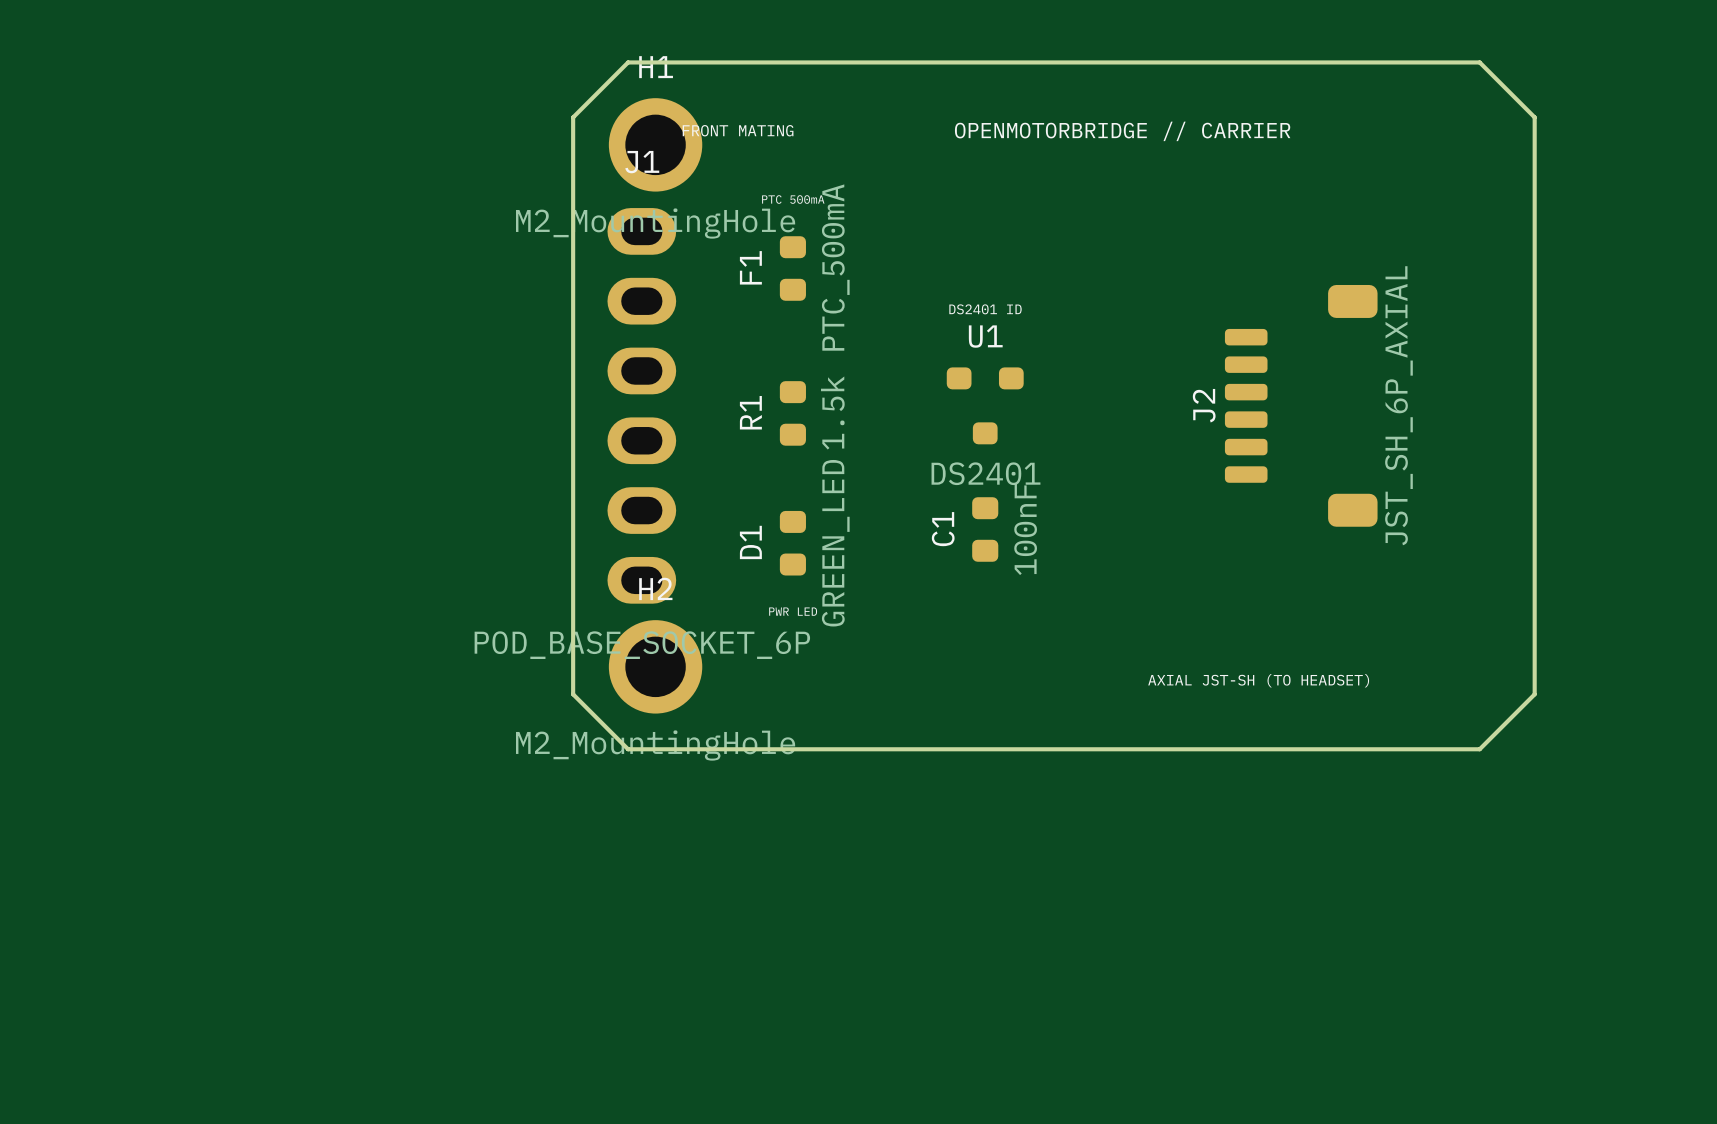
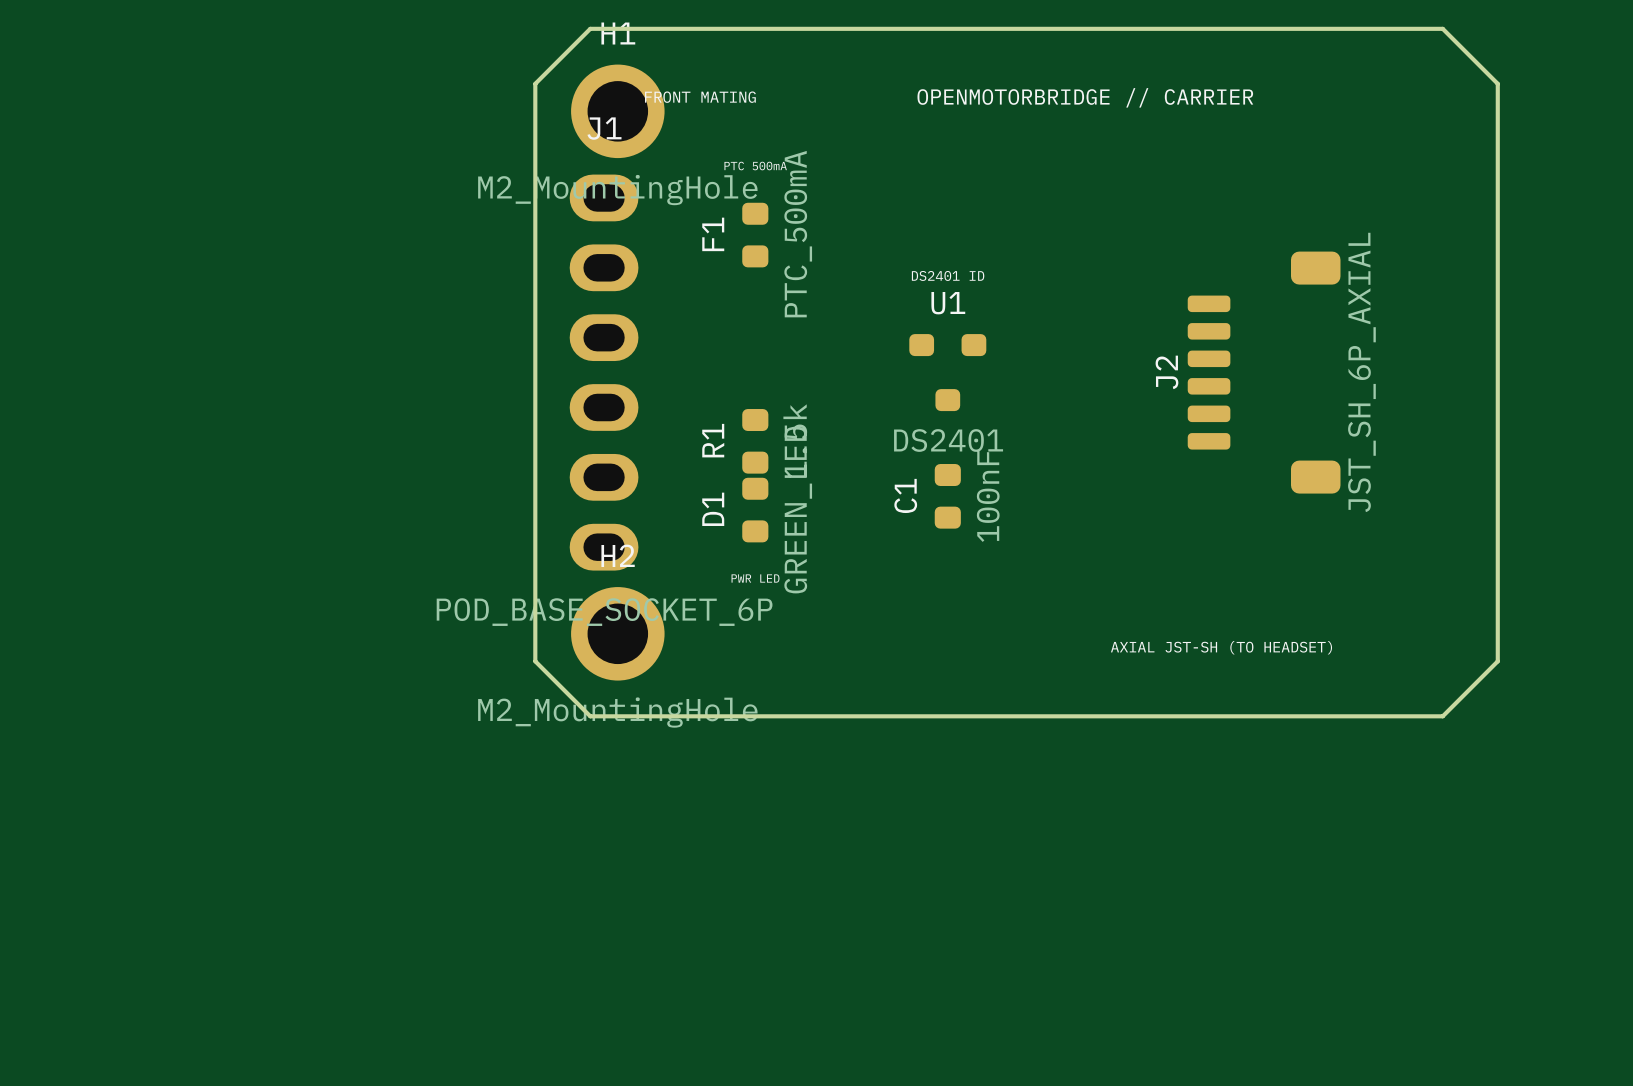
R1 position: (792, 413) -> (755, 441)

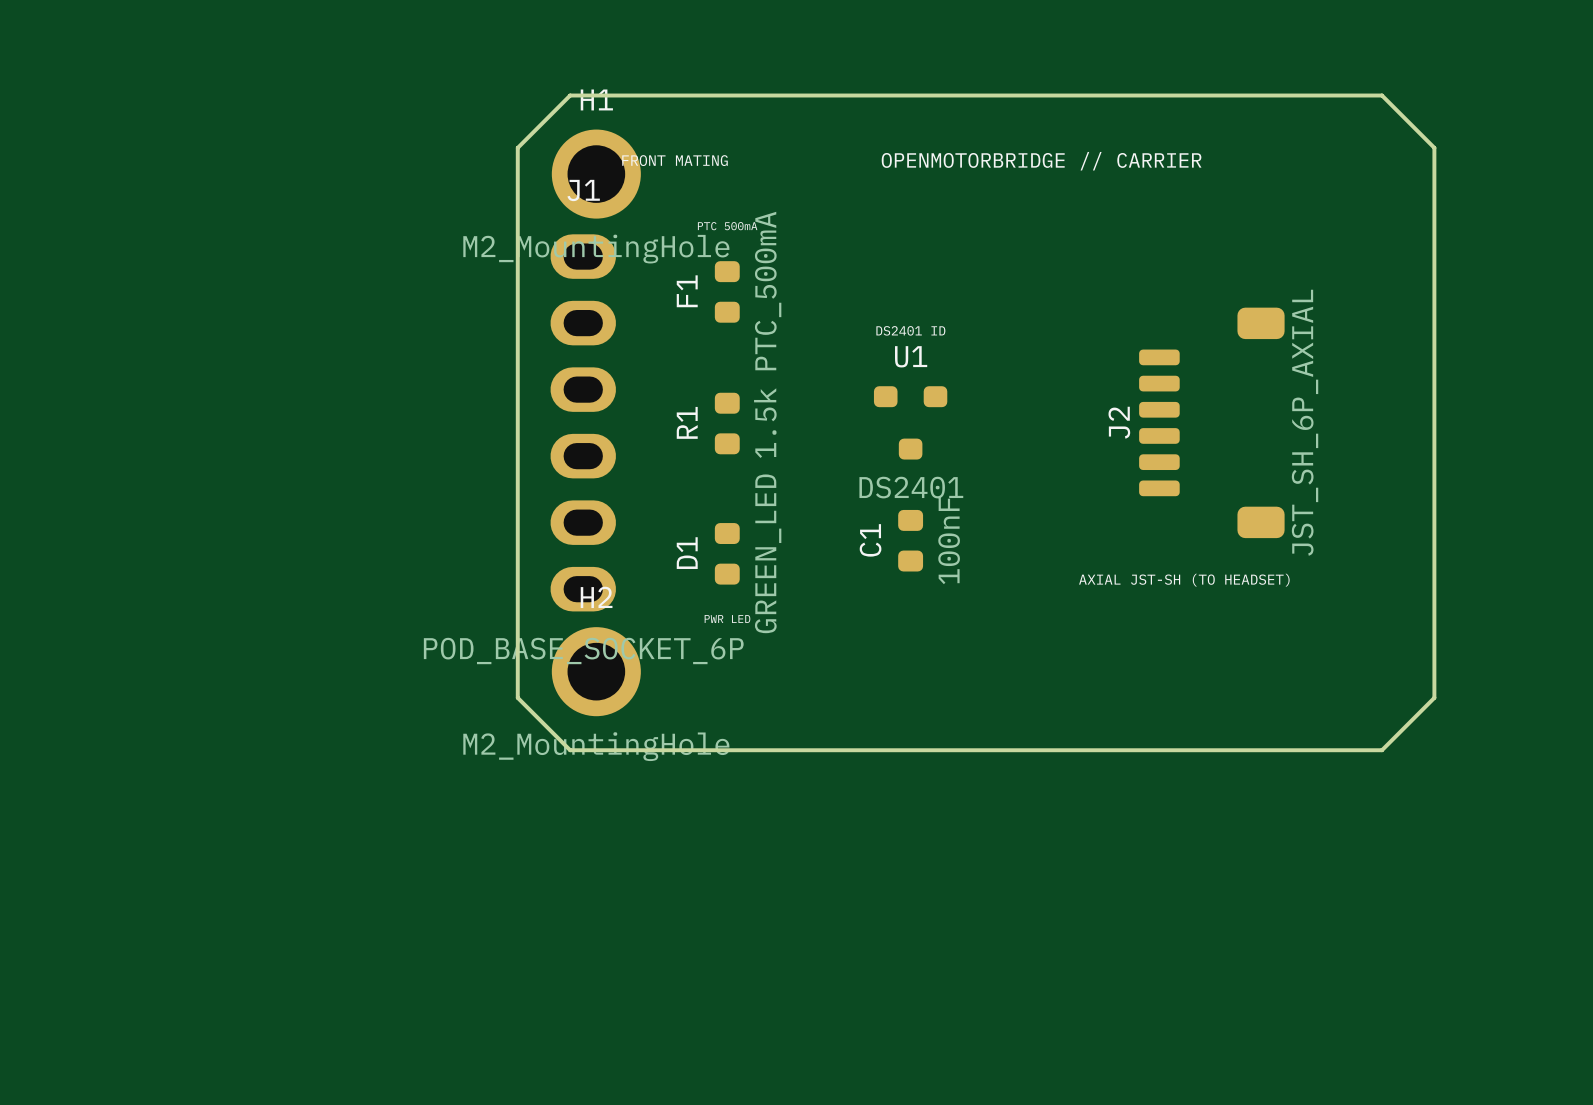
R1 position: (755, 441) -> (727, 423)
text position: AXIAL JST-SH (TO HEADSET) (1221, 647) -> AXIAL JST-SH (TO HEADSET) (1184, 580)

